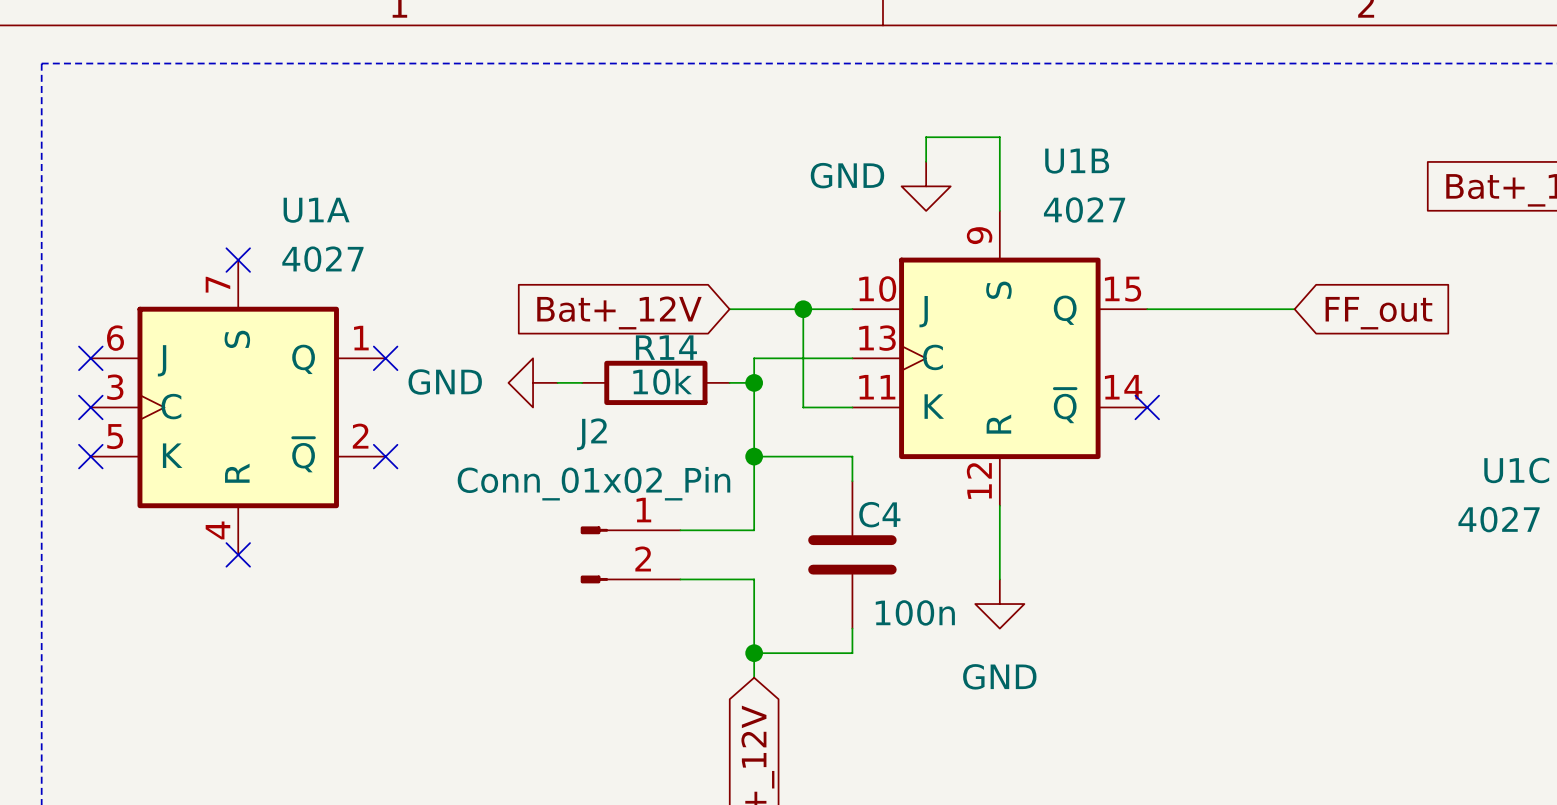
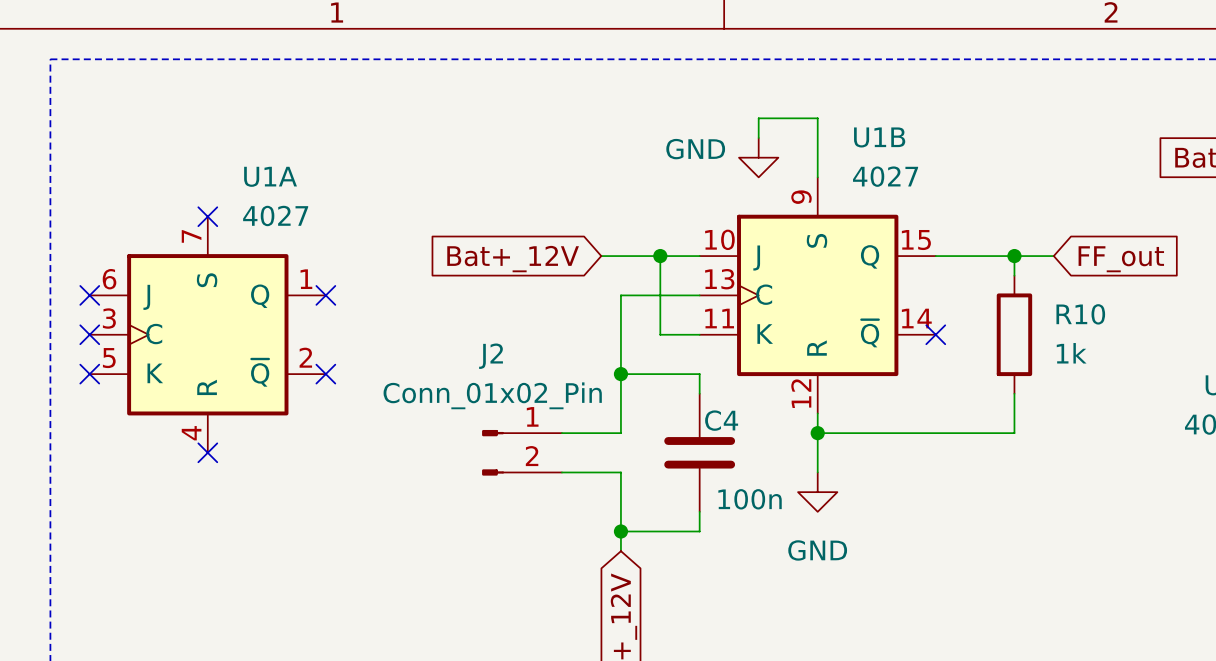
wire: none -> (1014, 256) (1014, 275)
junction: none -> (1014, 256)
power symbol: GND (533, 382) -> none
wire: (557, 382) (582, 382) -> none
R14: 10k (655, 382) -> none
wire: (729, 382) (754, 382) -> none
junction: (754, 382) -> none
R10: none -> 1k (1014, 334)
wire: none -> (1014, 393) (1014, 433) (817, 433)
junction: none -> (817, 433)

